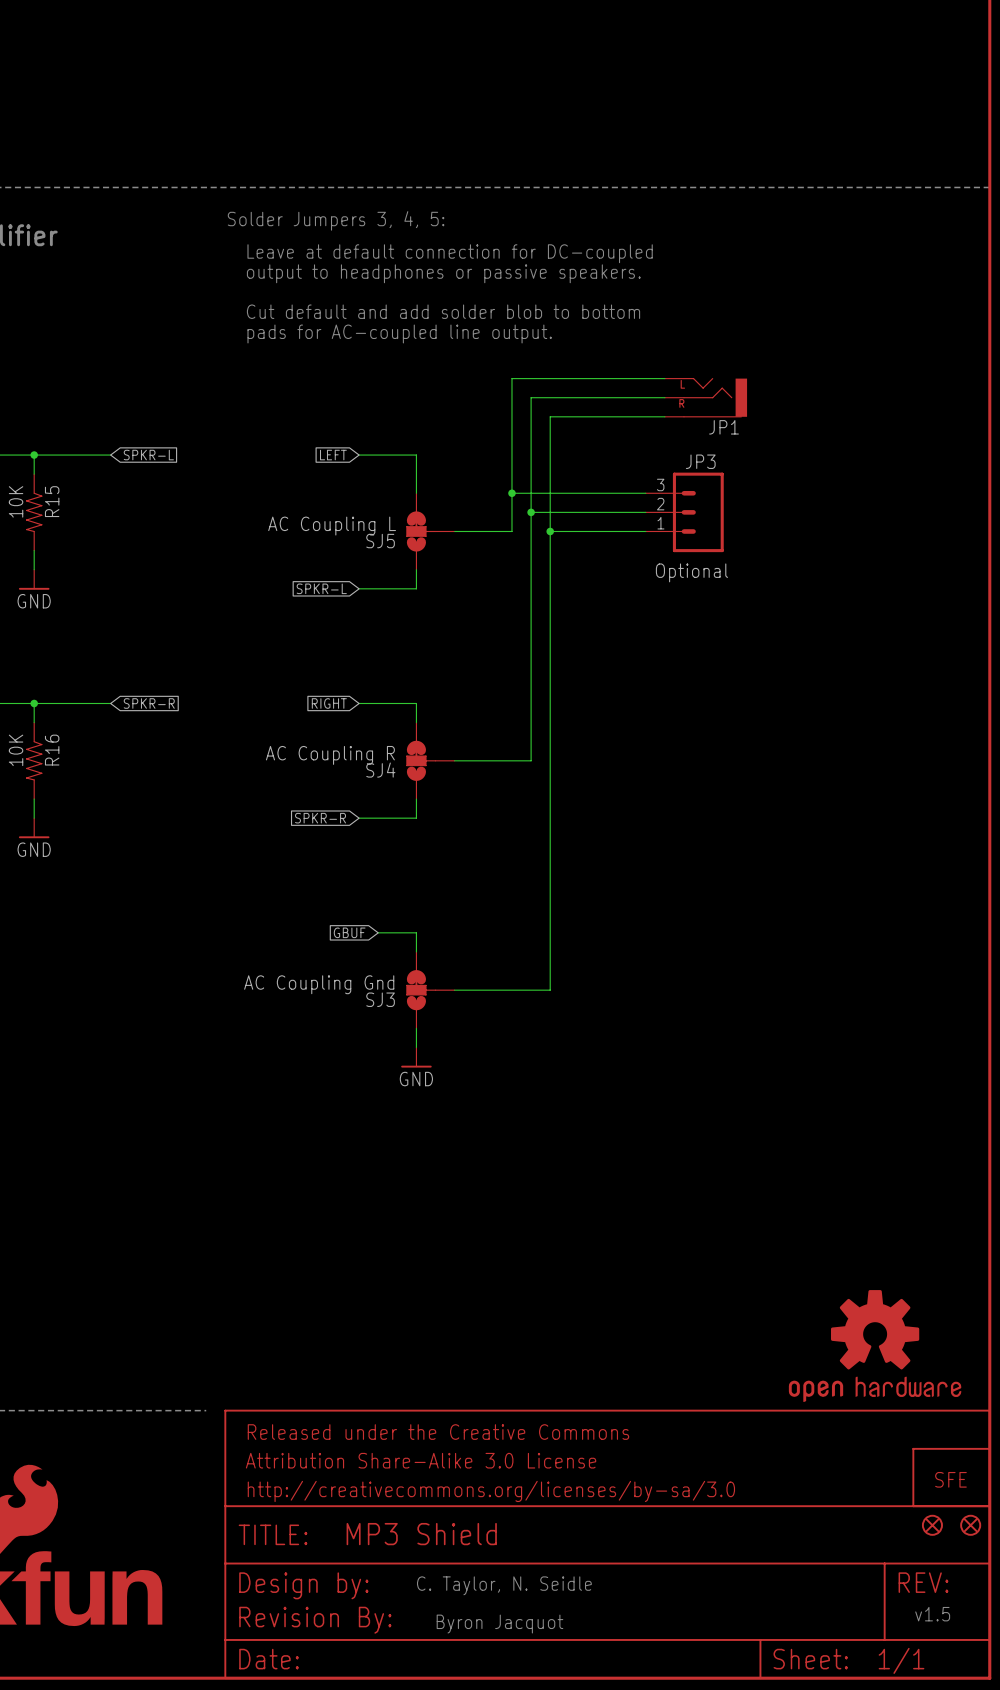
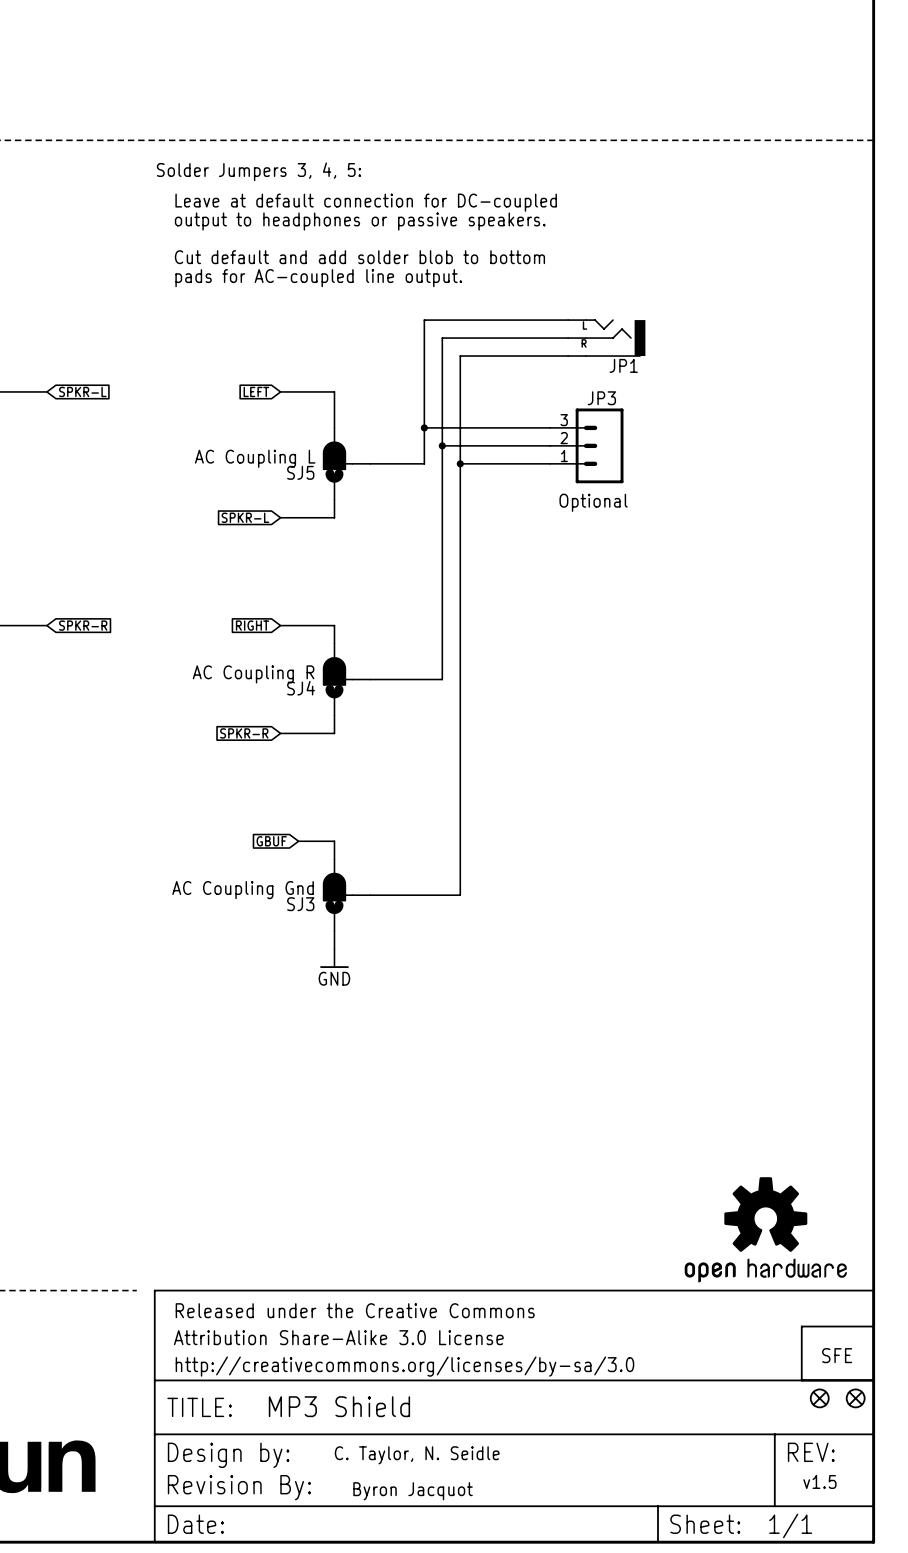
SJ5 symbol: [406, 493, 455, 570] -> [322, 427, 371, 500]
SJ4 symbol: [406, 722, 455, 800] -> [322, 643, 371, 716]
SJ3 symbol: [406, 951, 455, 1029] -> [322, 859, 371, 932]

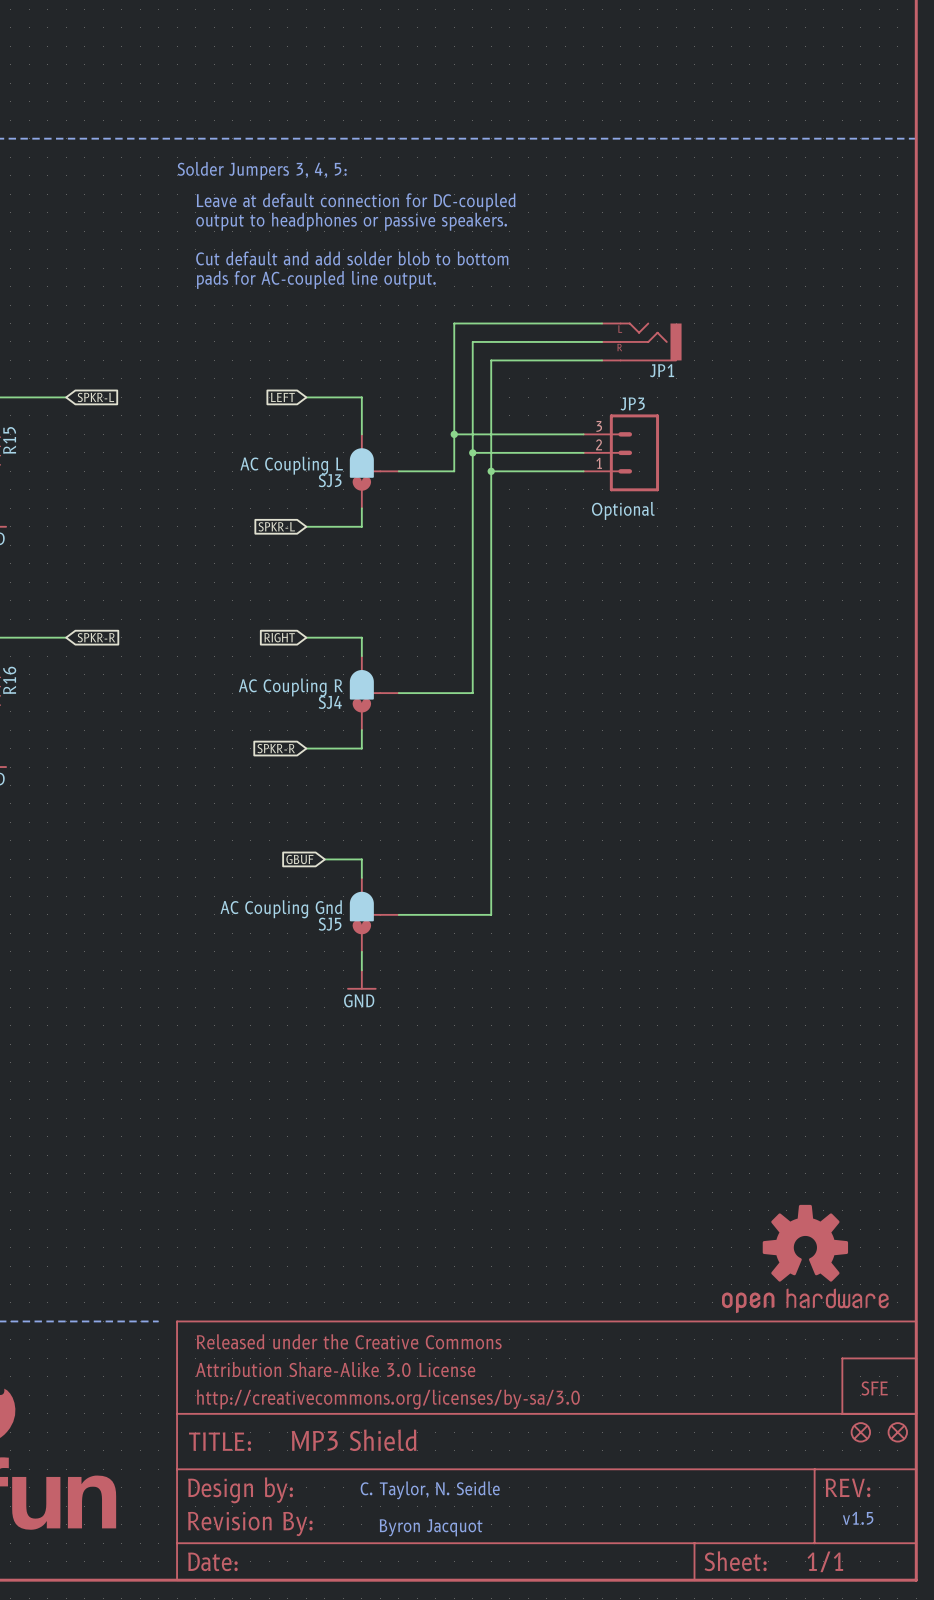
SJ5 name: SJ5 (300, 472) -> SJ3 (330, 480)
SJ3 name: SJ3 (300, 904) -> SJ5 (330, 924)

